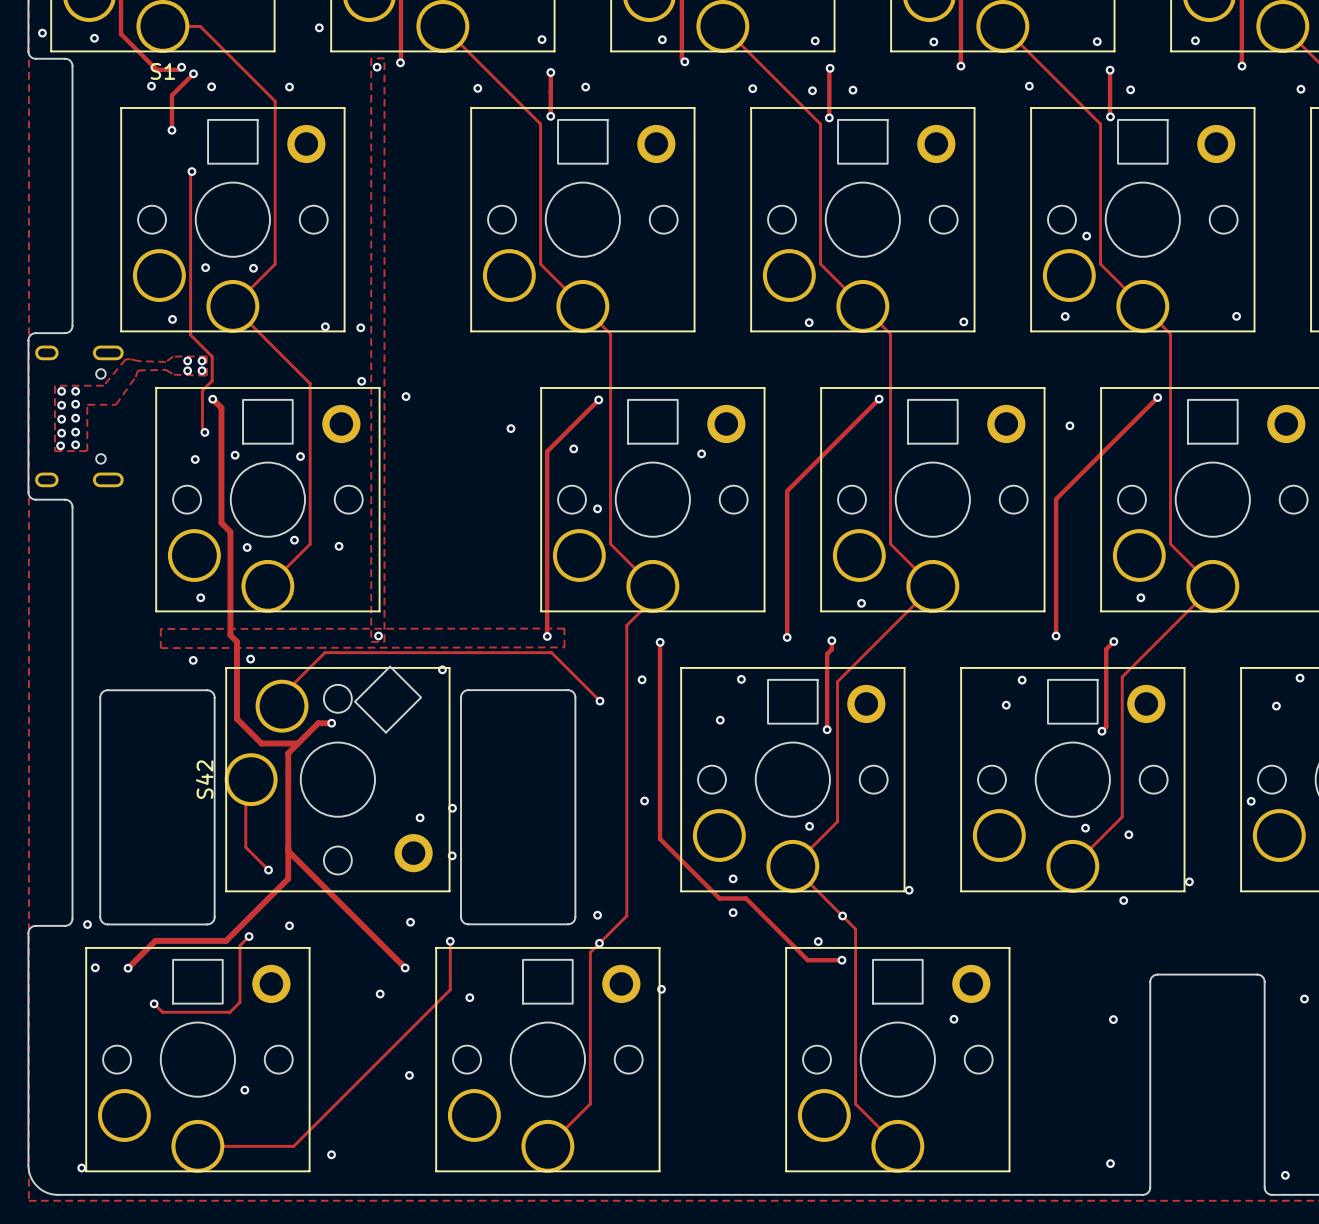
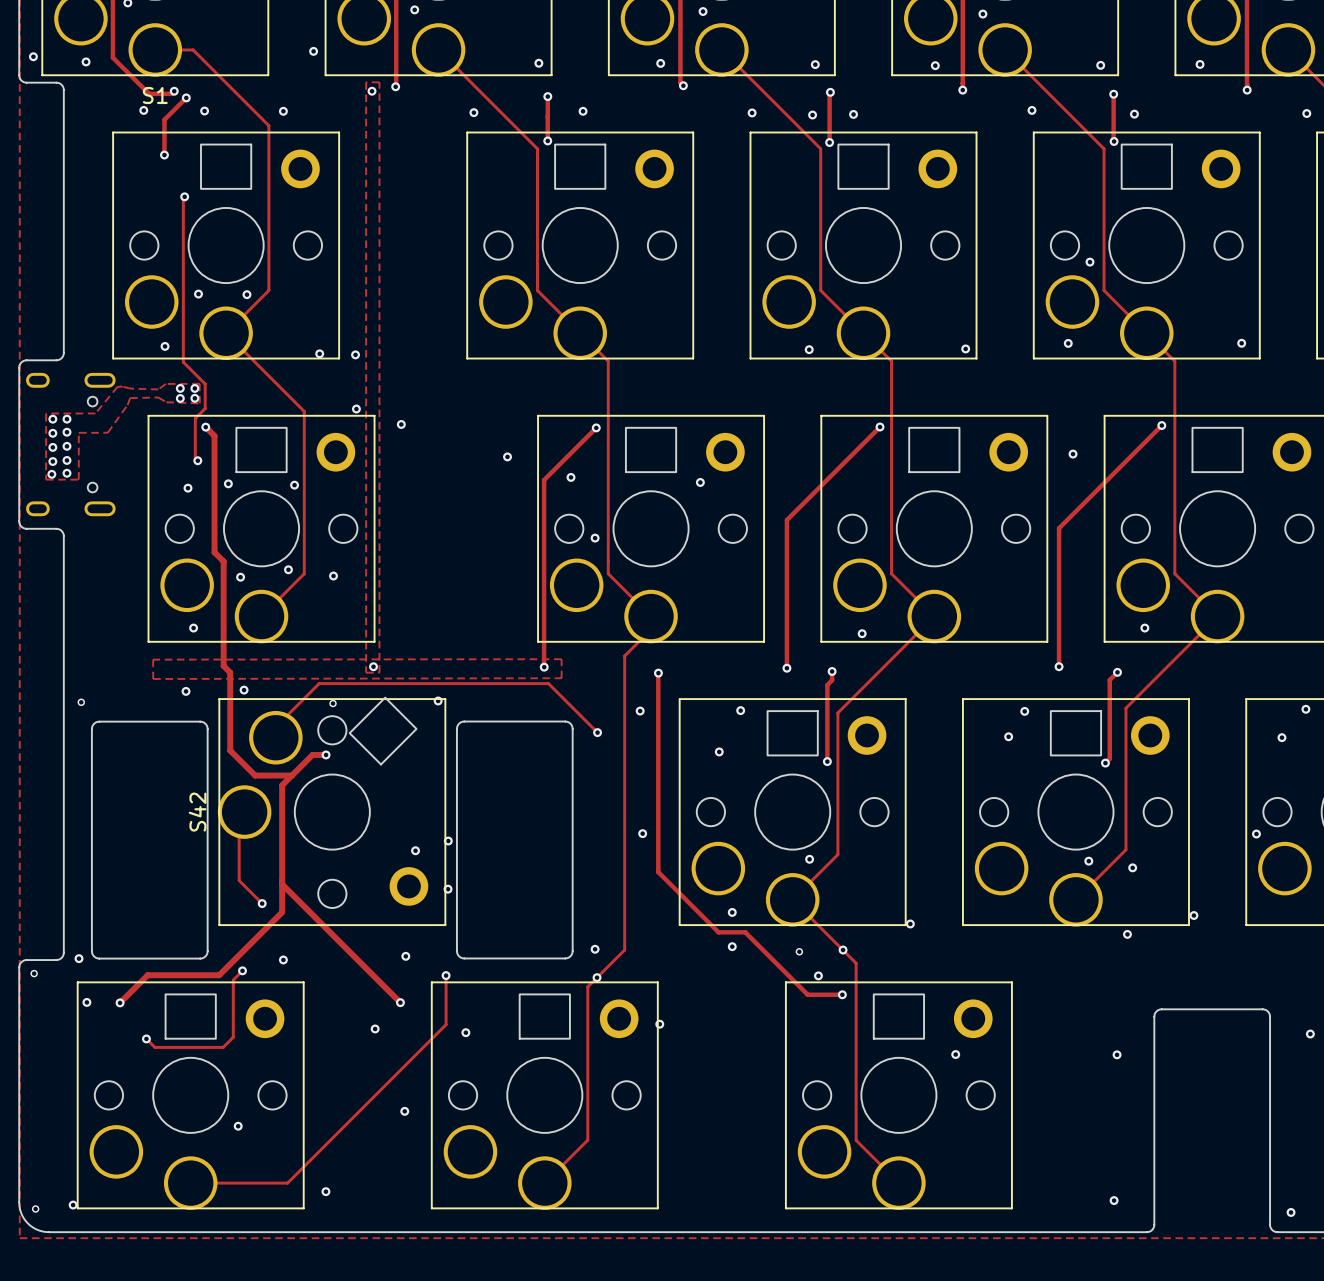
via: none -> (81, 702)
via: none -> (333, 703)
via: none -> (799, 951)
via: none -> (34, 973)
via: none -> (35, 1208)

